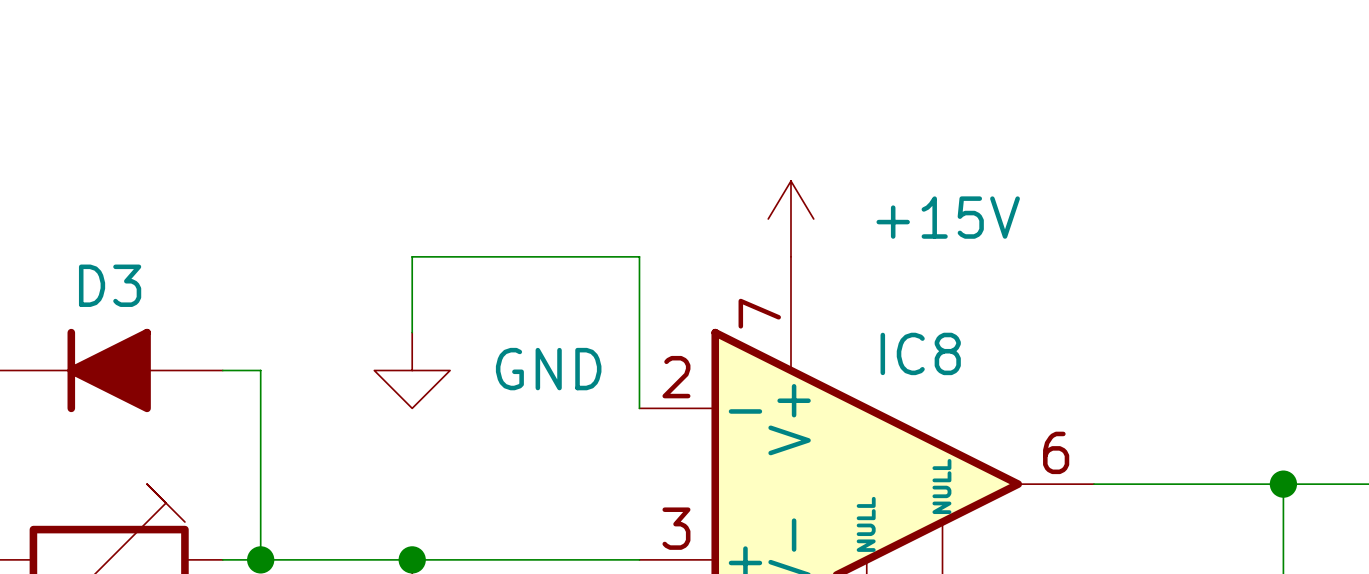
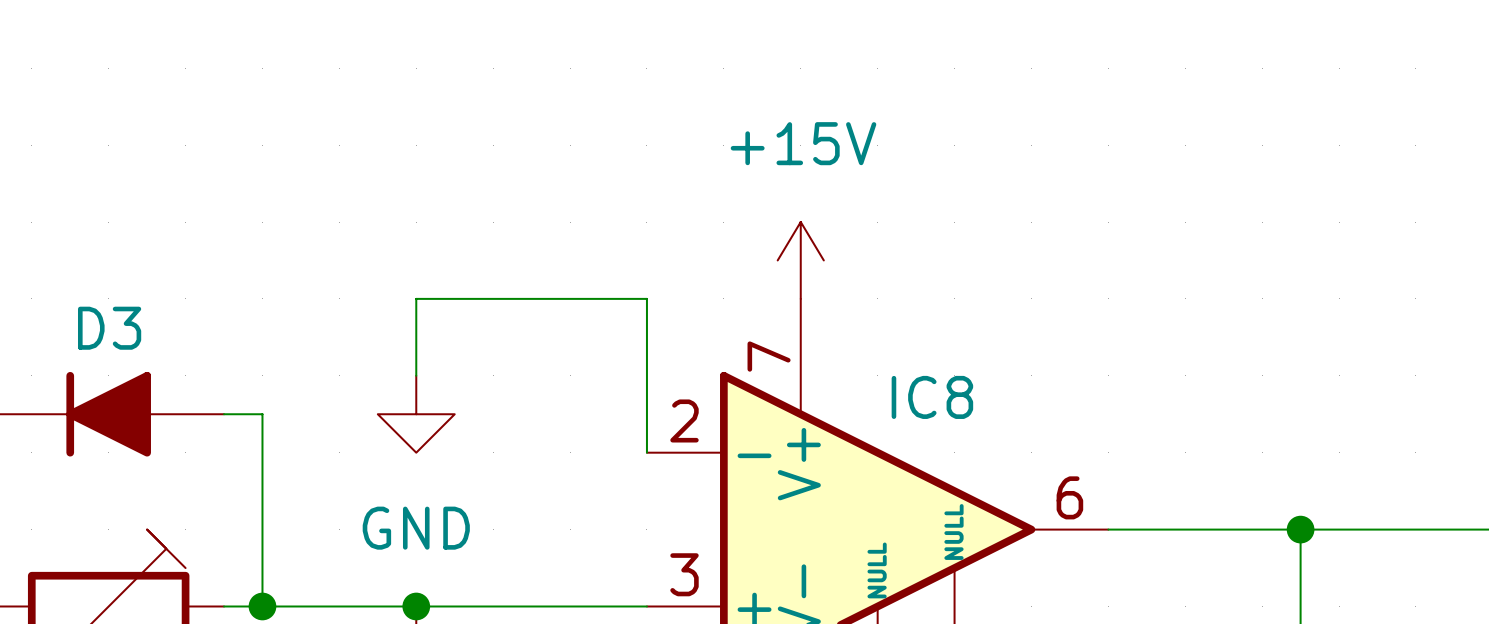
power symbol text position: +15V (948, 217) -> +15V (803, 143)
power symbol text position: GND (548, 369) -> GND (416, 528)

